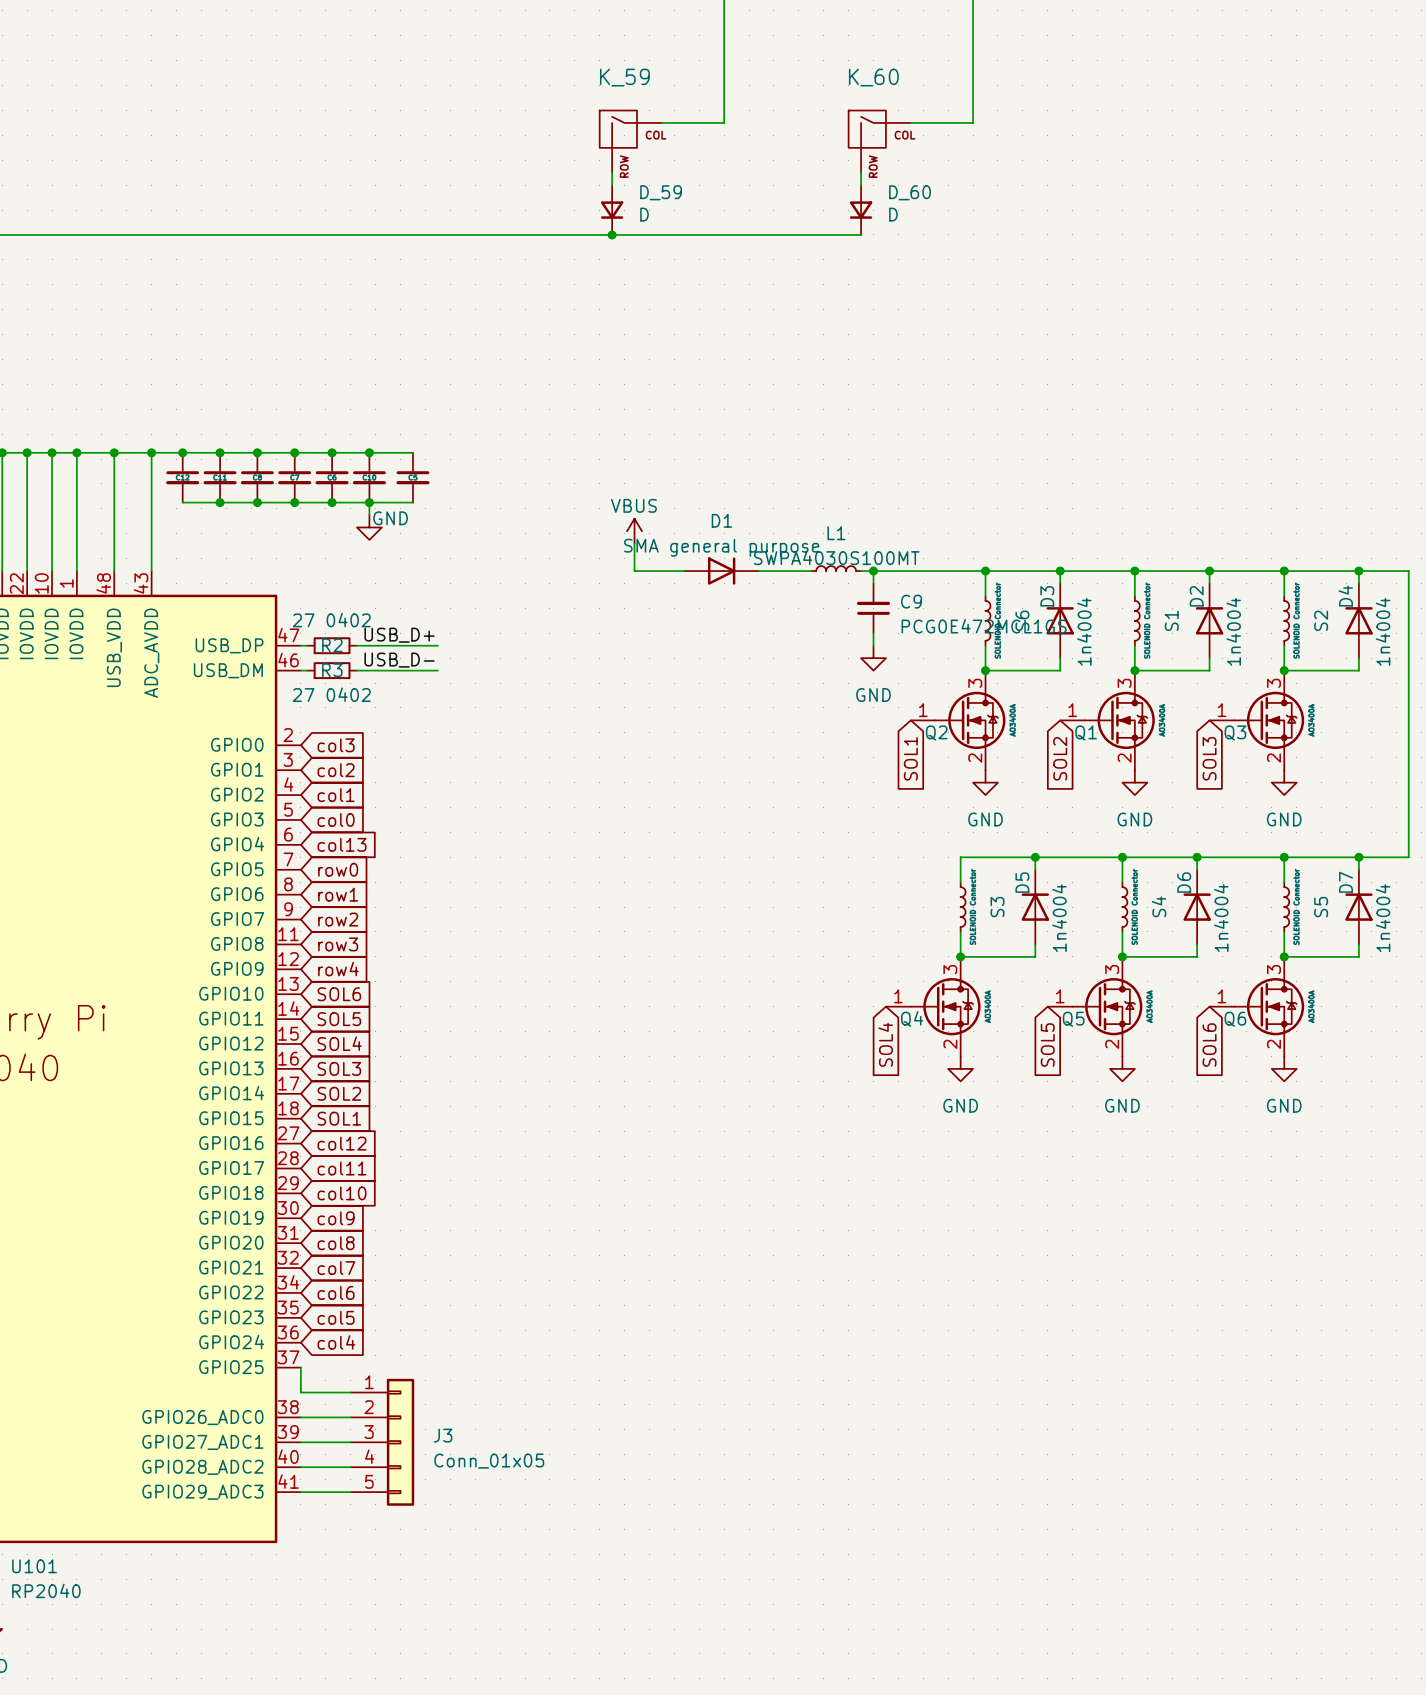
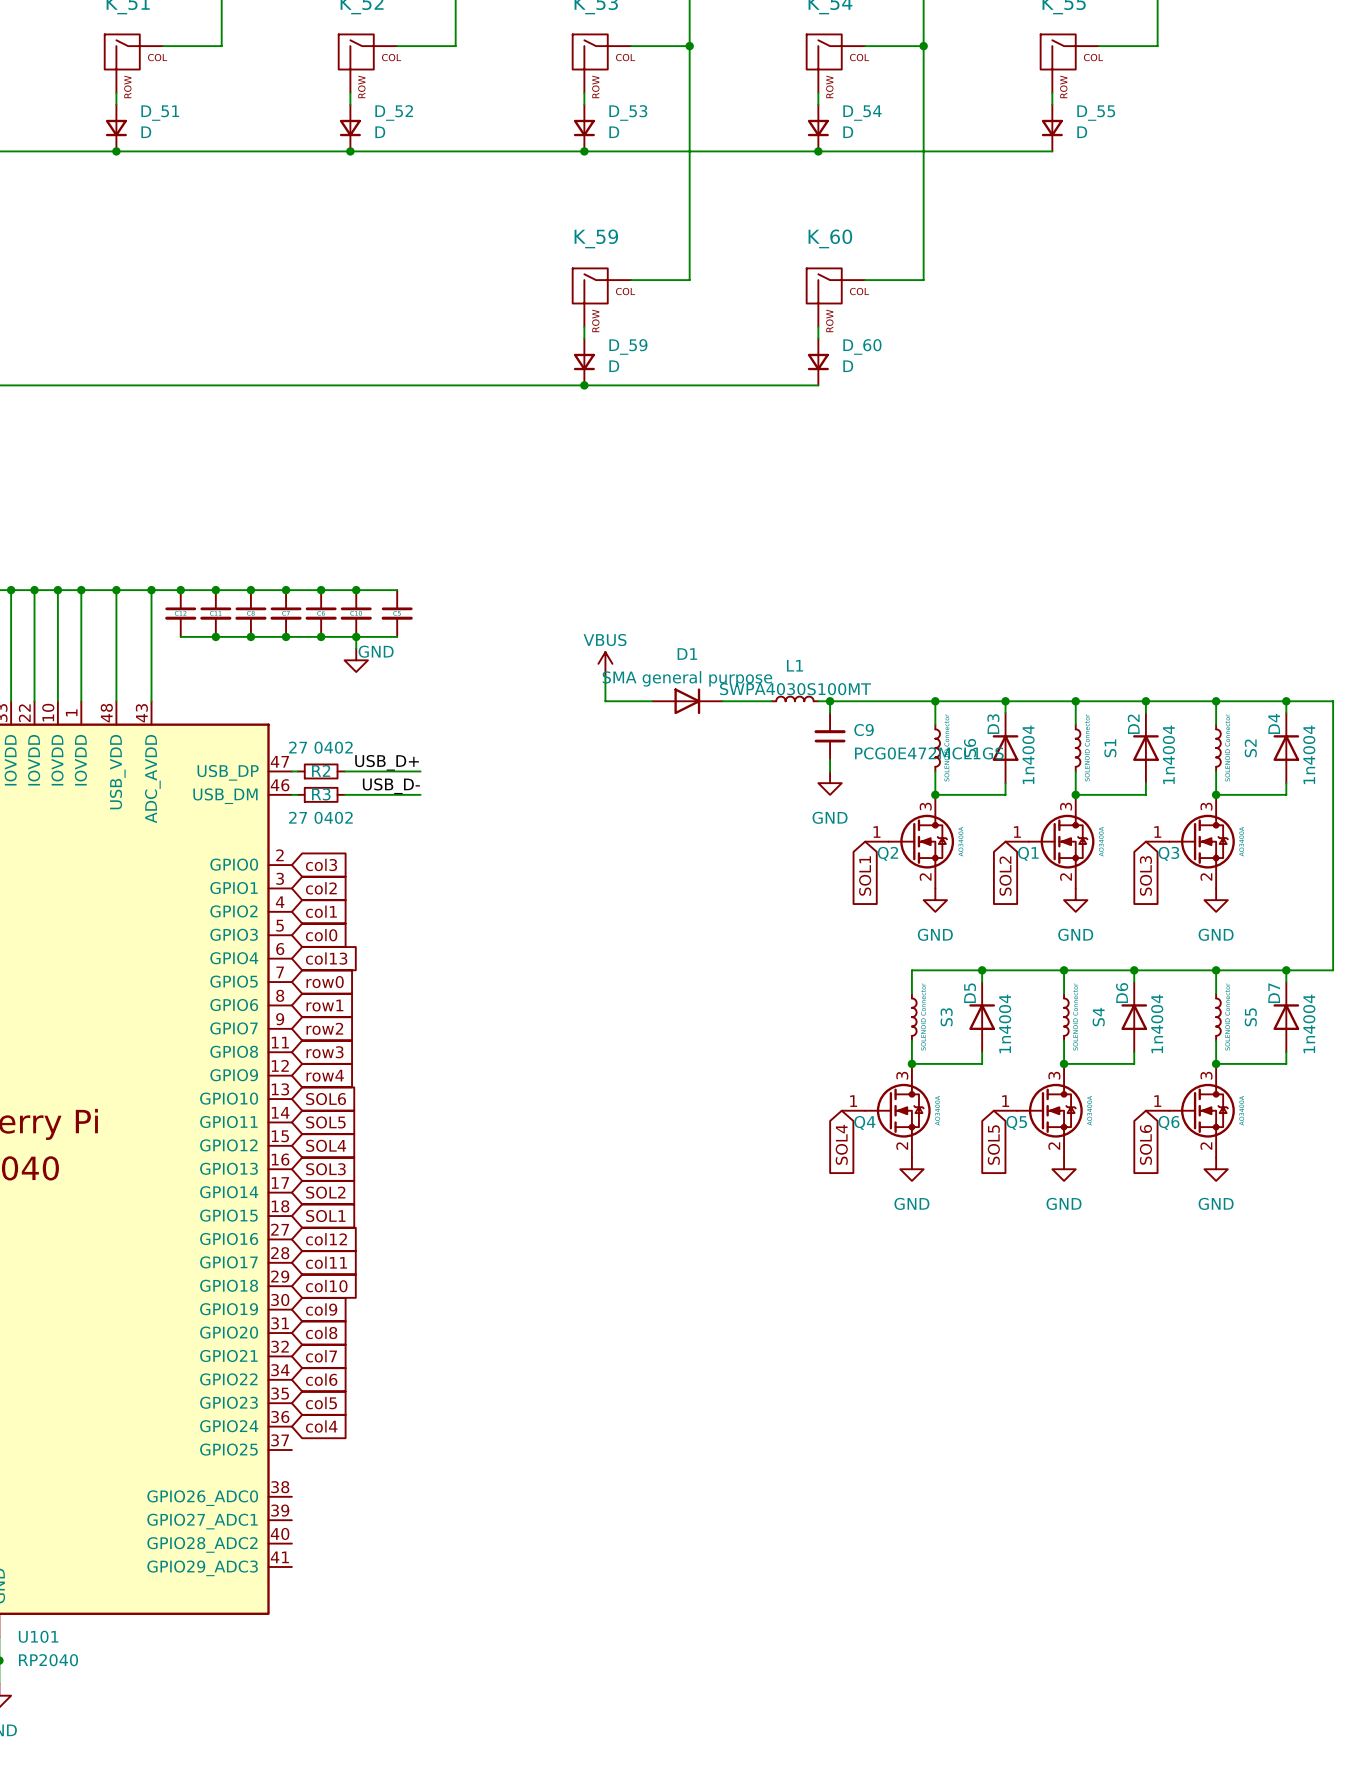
wire: (300, 1367) (300, 1392) (350, 1392) -> none
wire: (300, 1417) (350, 1417) -> none
wire: (300, 1442) (350, 1442) -> none
J3: Conn_01x05 (382, 1442) -> none
wire: (300, 1467) (350, 1467) -> none
wire: (300, 1492) (350, 1492) -> none

